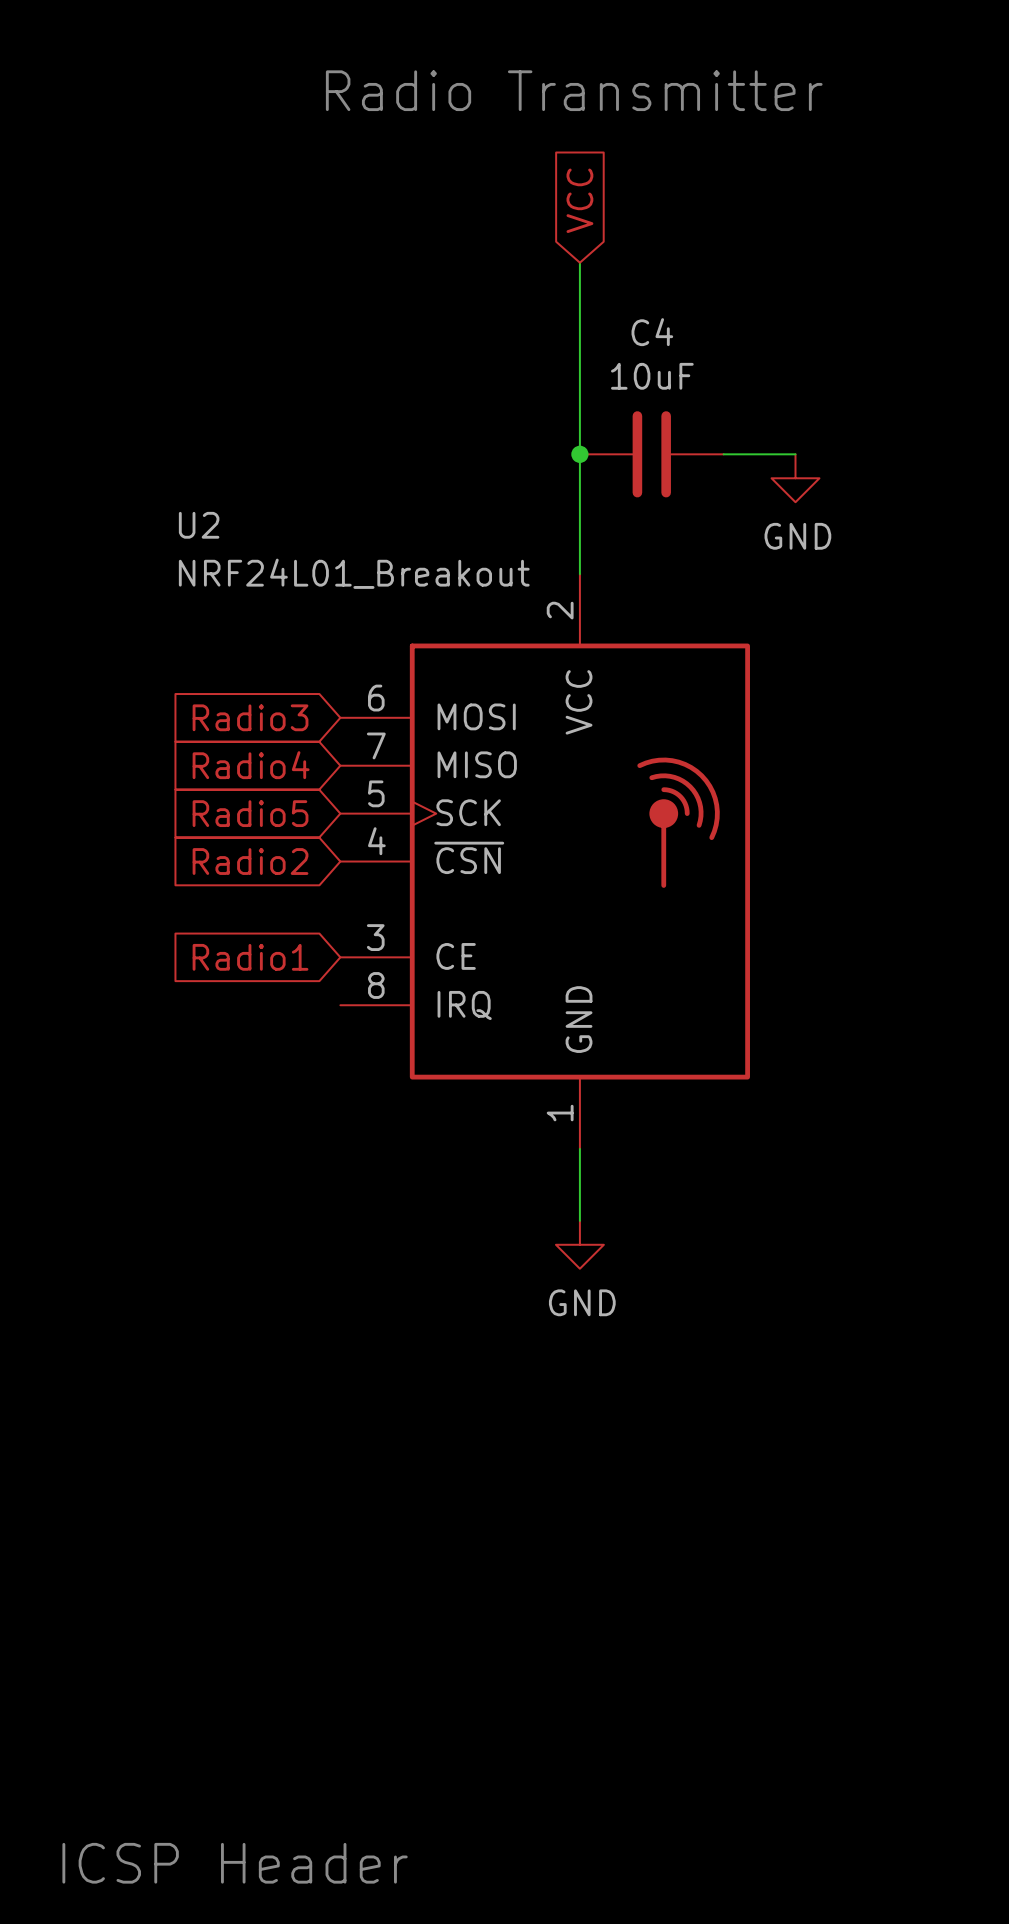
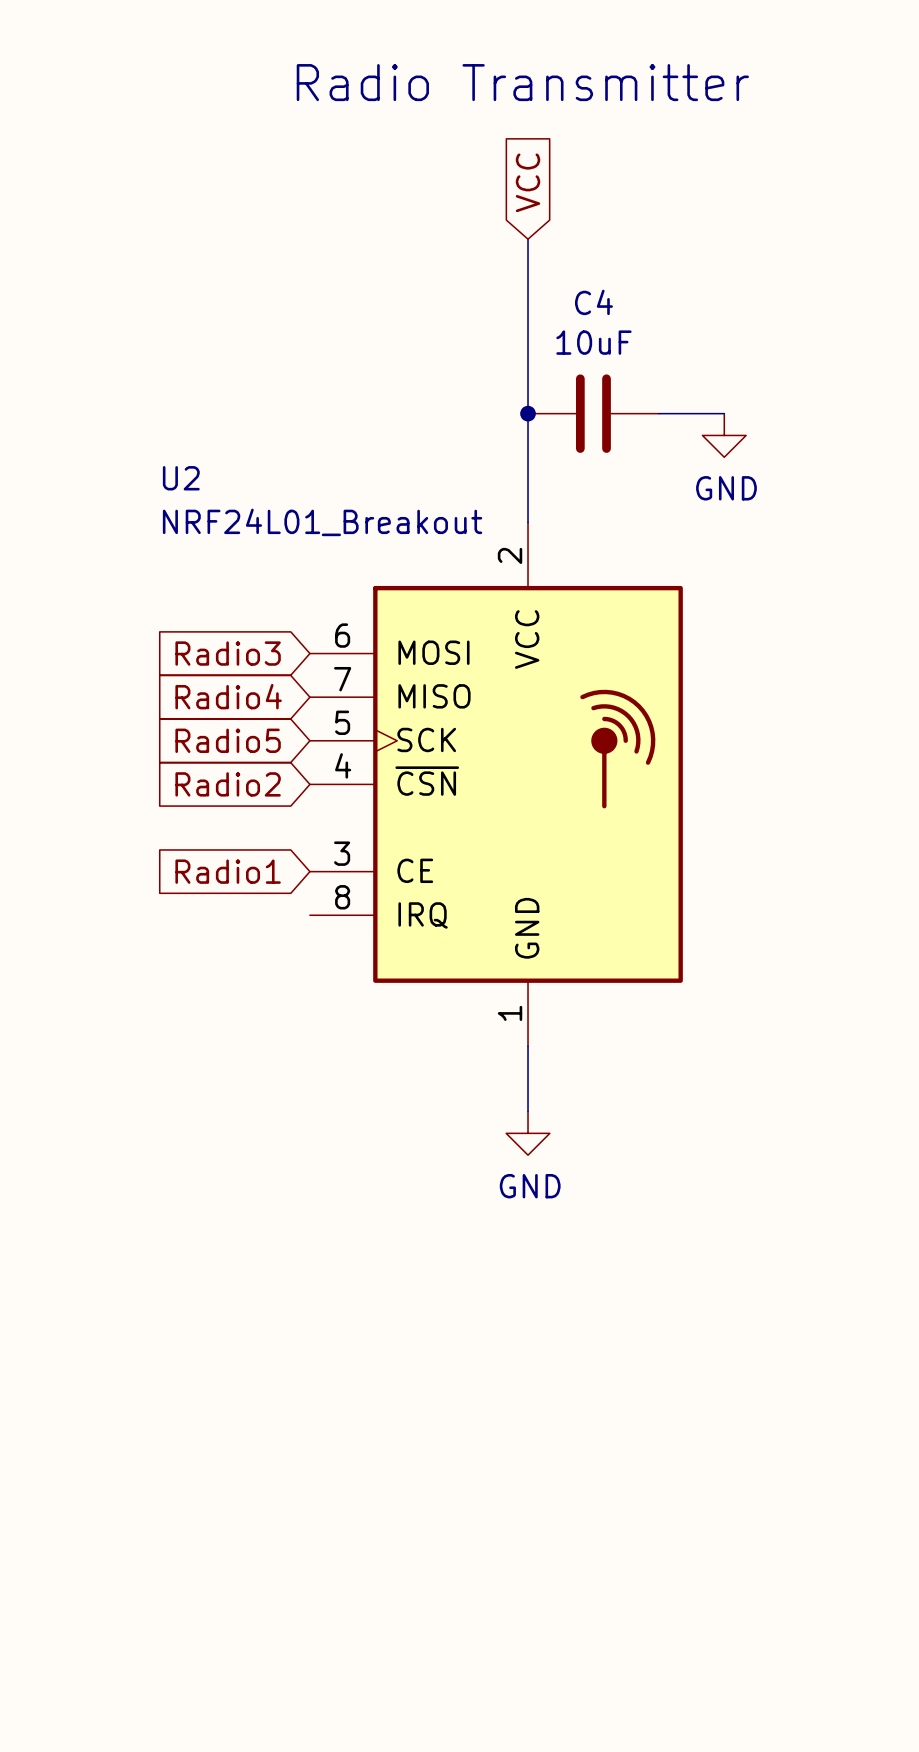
text: ICSP Header (235, 1863) -> none

